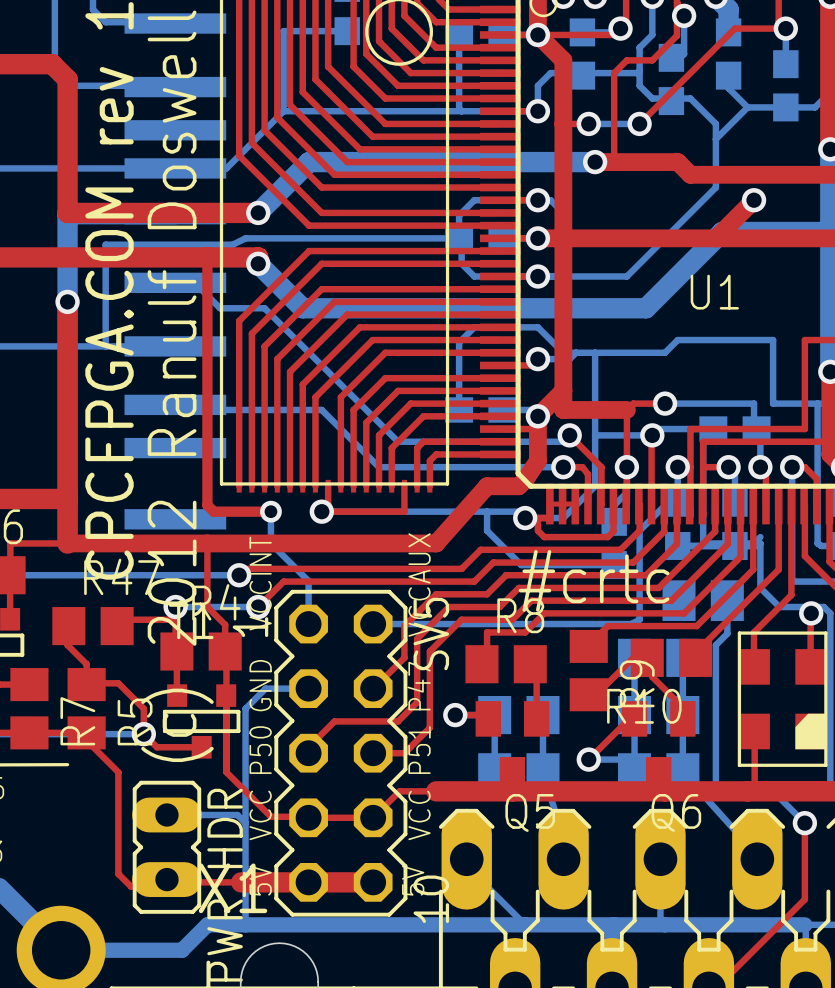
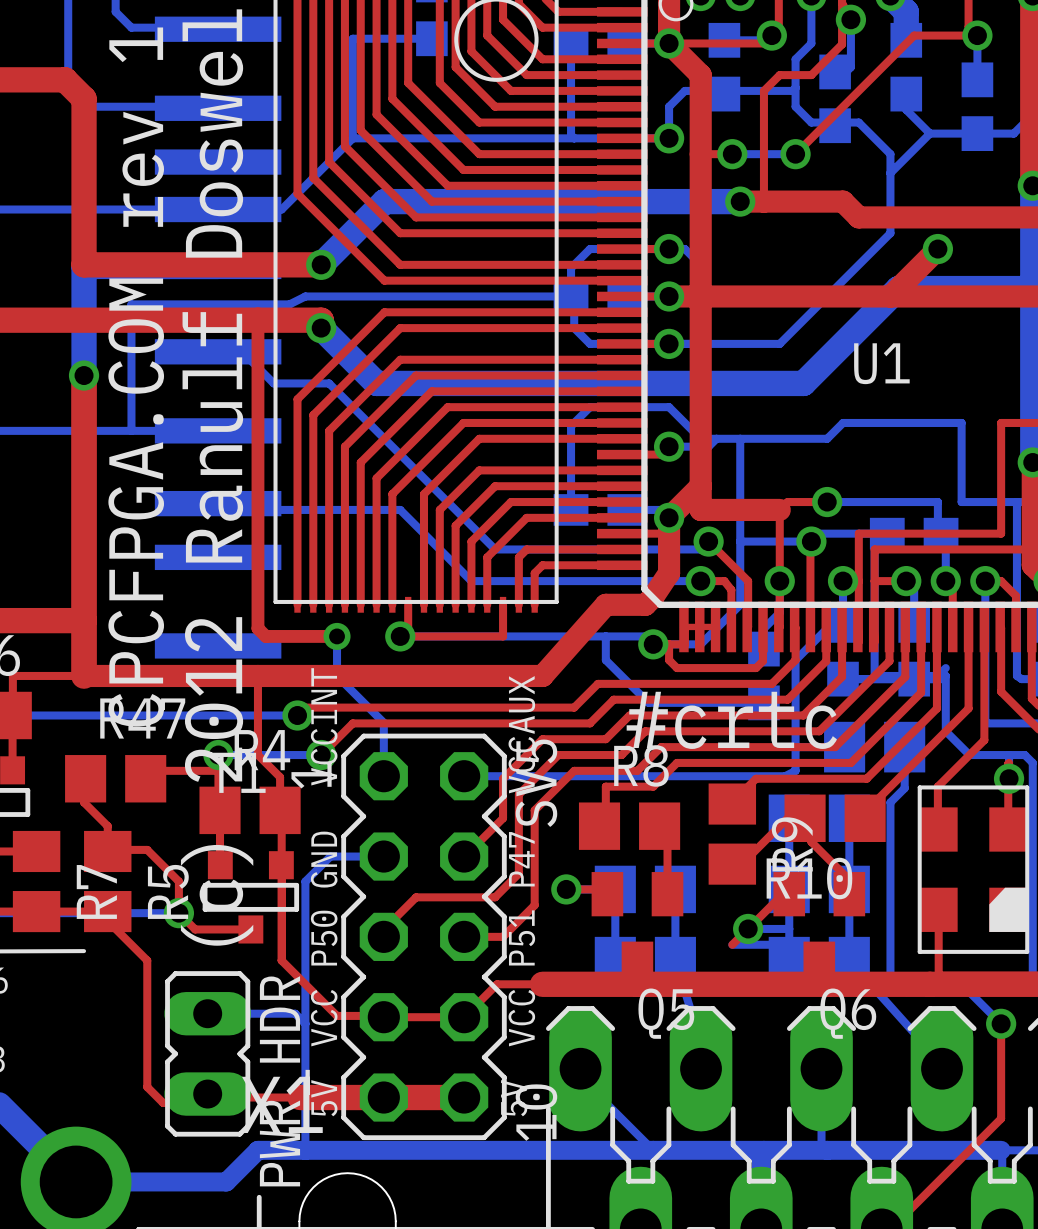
via position: (811, 613) -> (1009, 778)
bottom track: none -> (763, 928) (789, 928)
via position: (588, 759) -> (748, 928)

